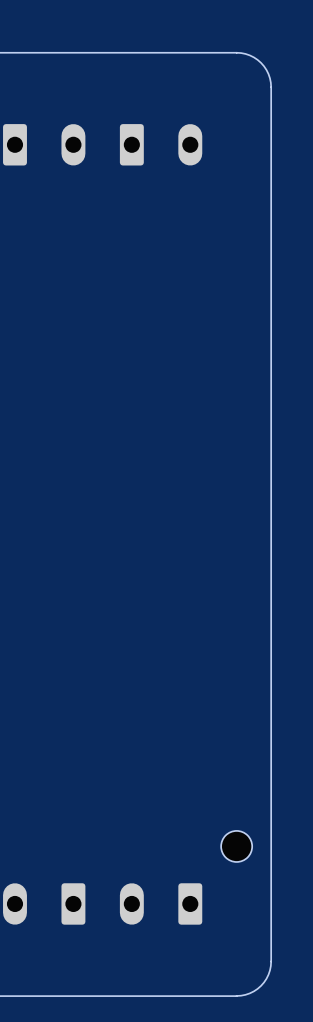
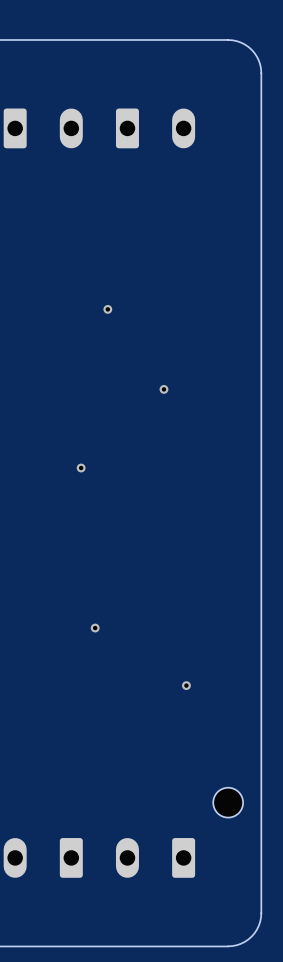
via: none -> (107, 309)
via: none -> (163, 389)
via: none -> (81, 468)
via: none -> (95, 628)
via: none -> (186, 685)

